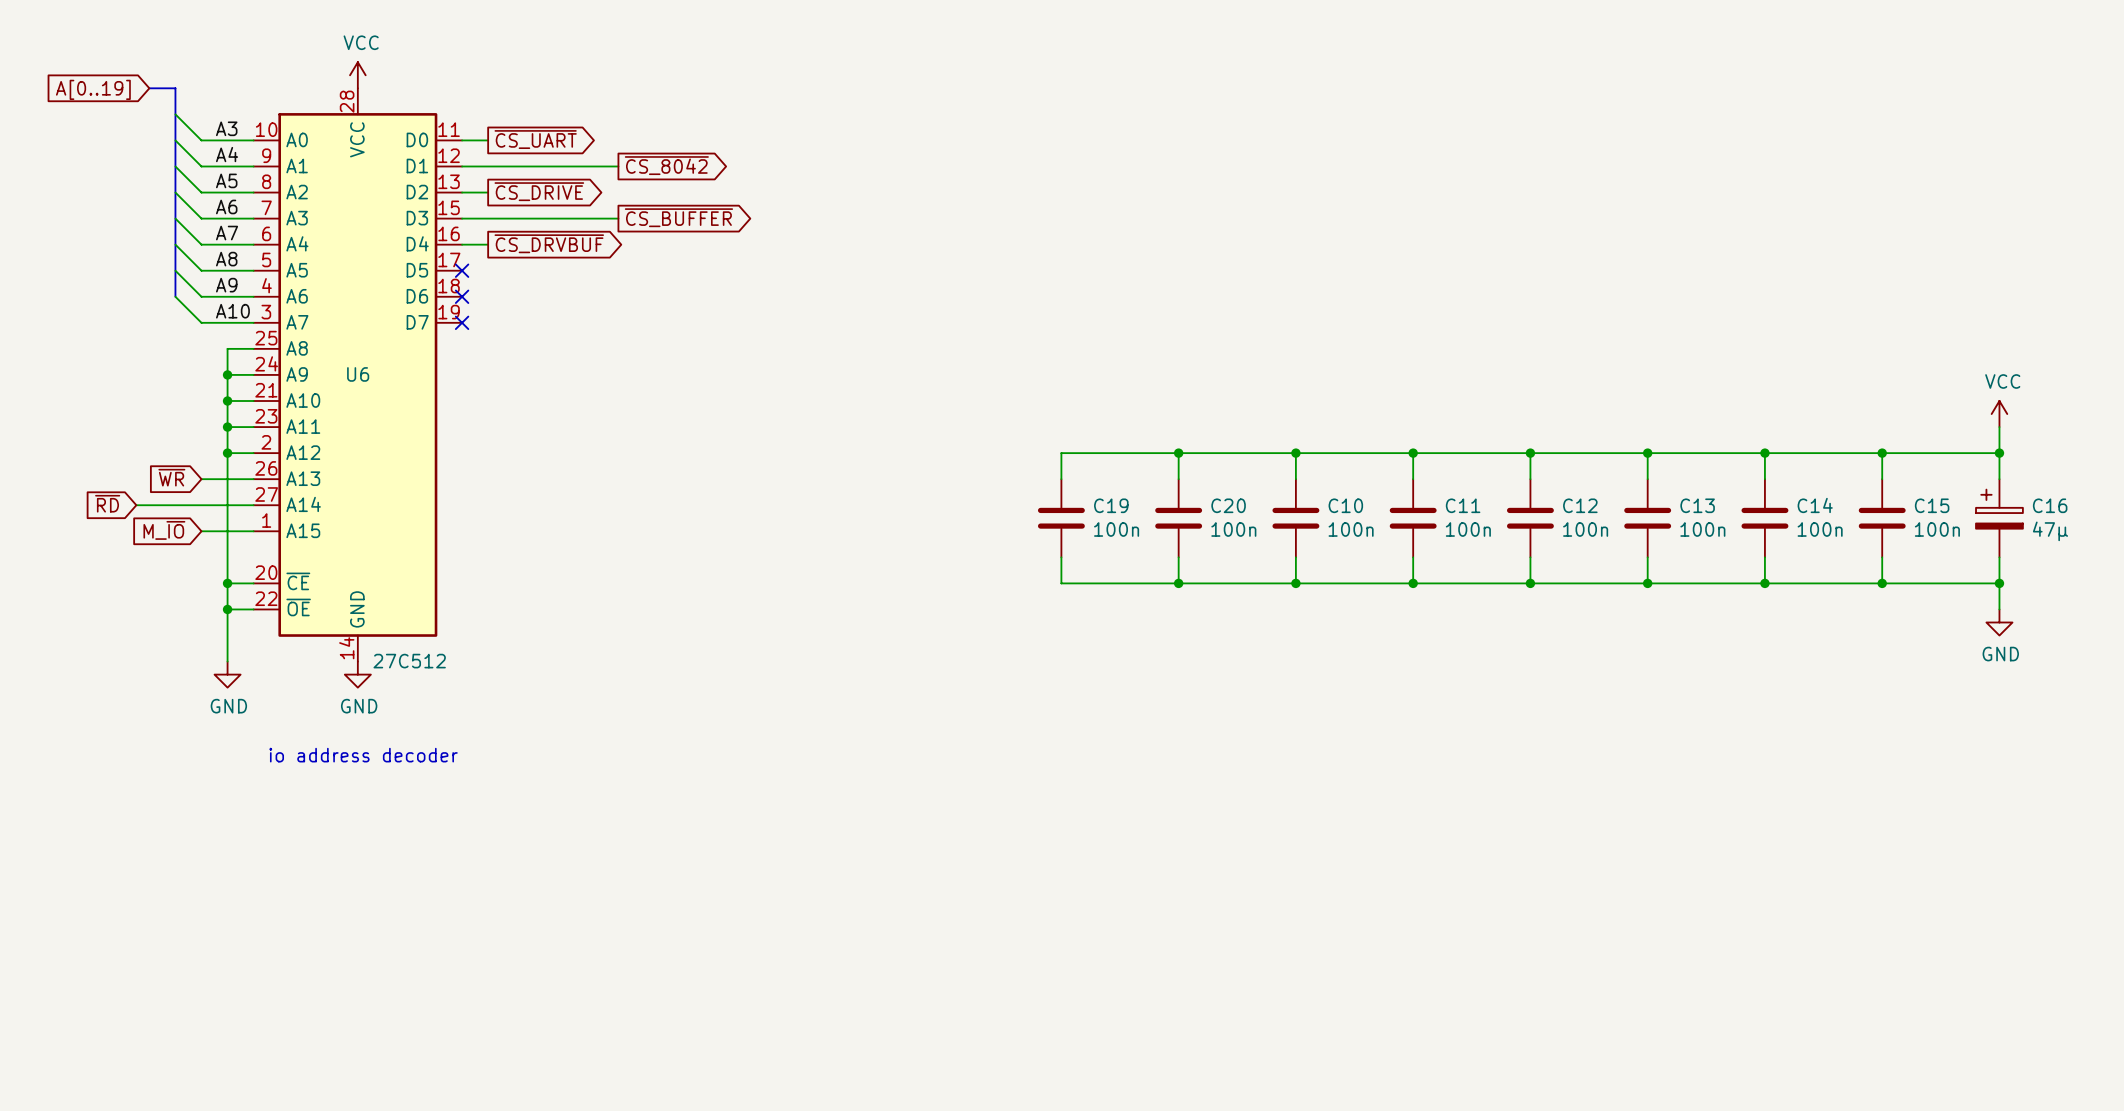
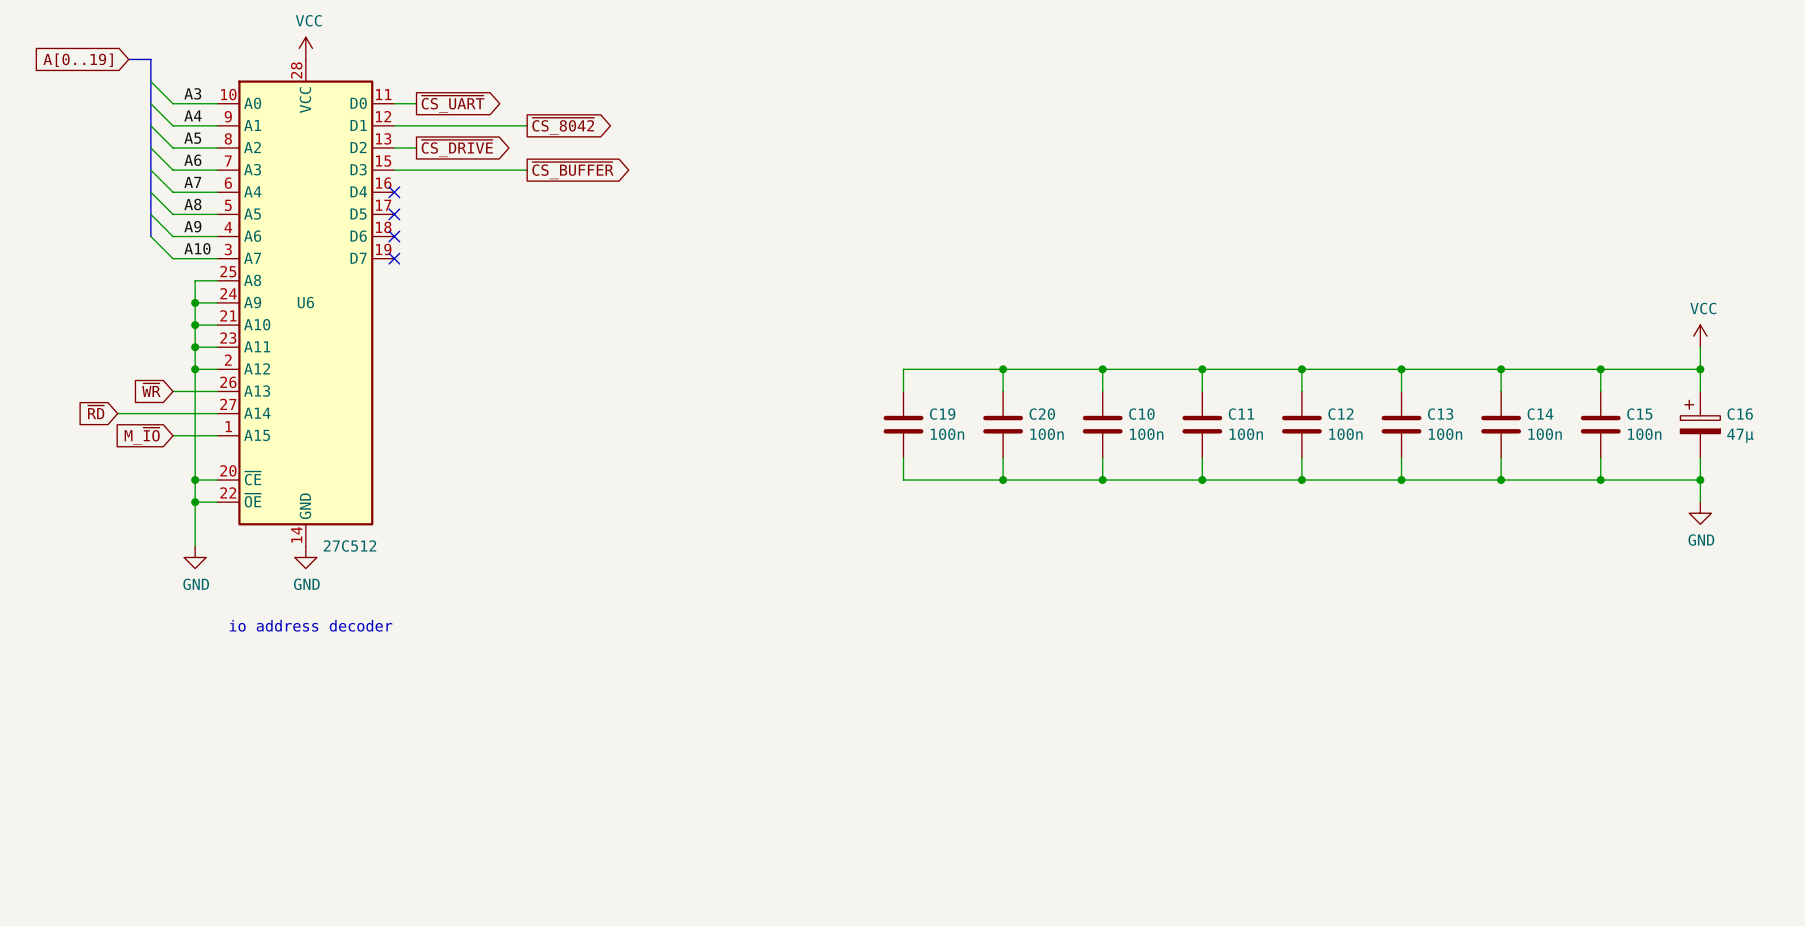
global label: ~{CS_DRVBUF} (549, 243) -> none
wire: (462, 244) (488, 244) -> none
no-connect mark: none -> (394, 192)

